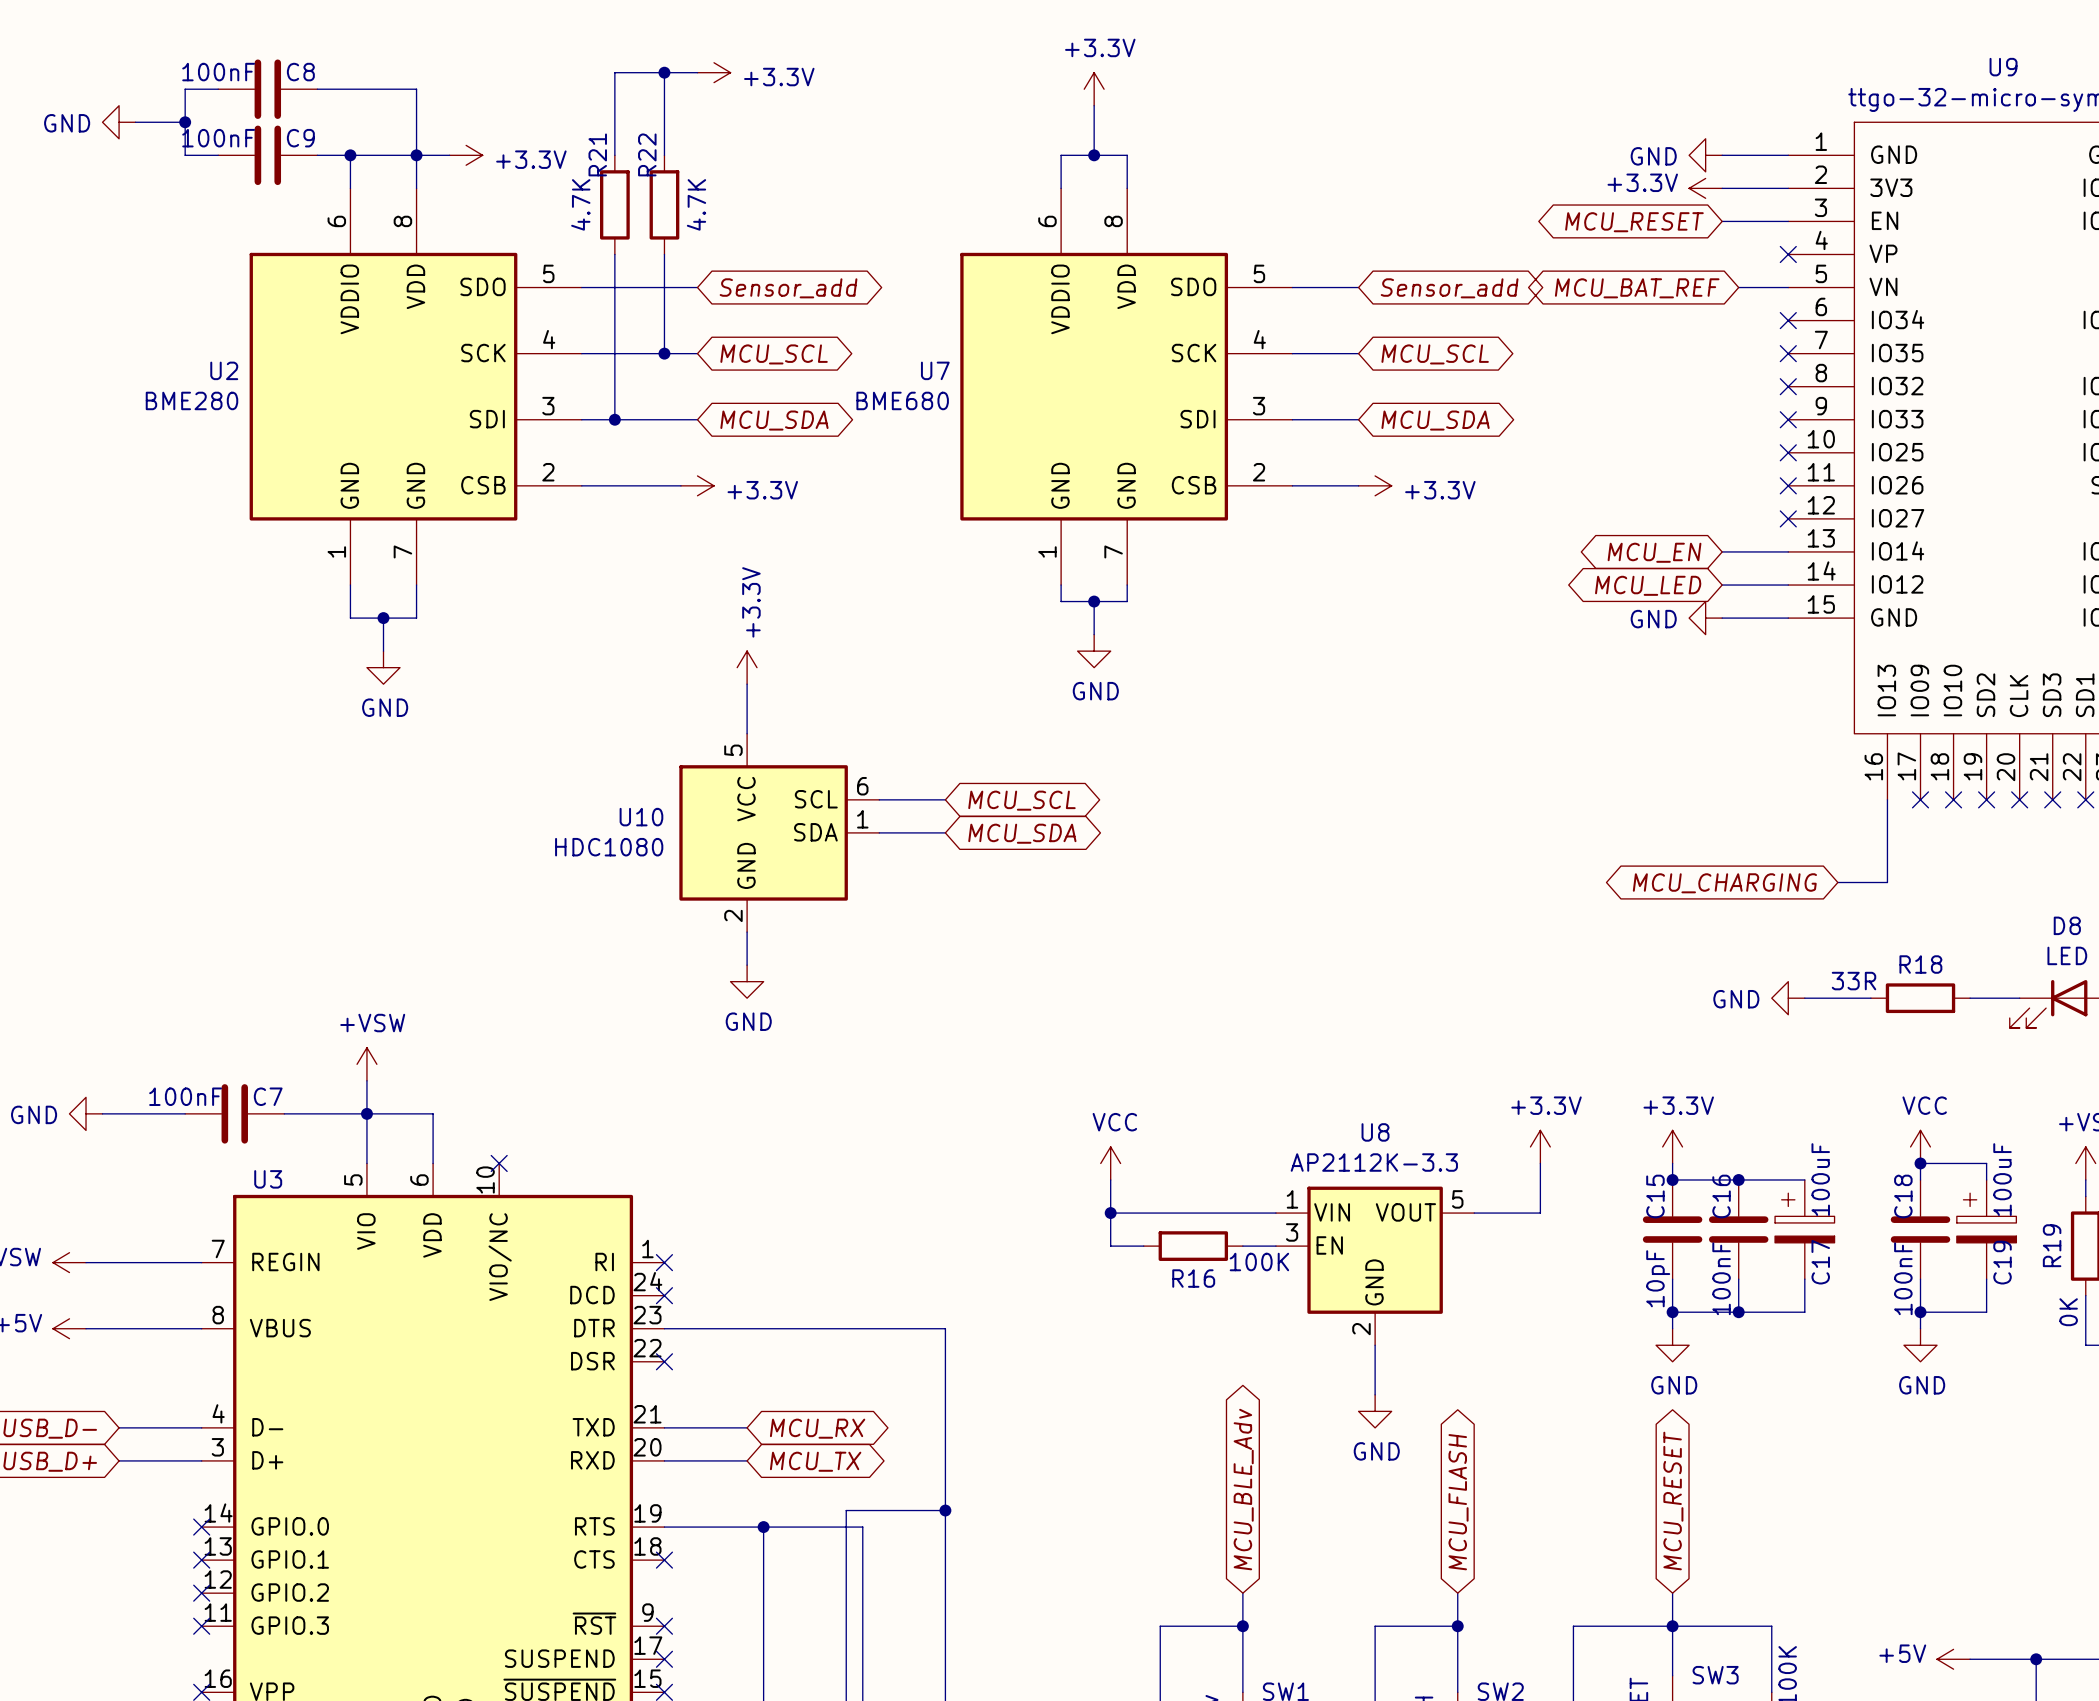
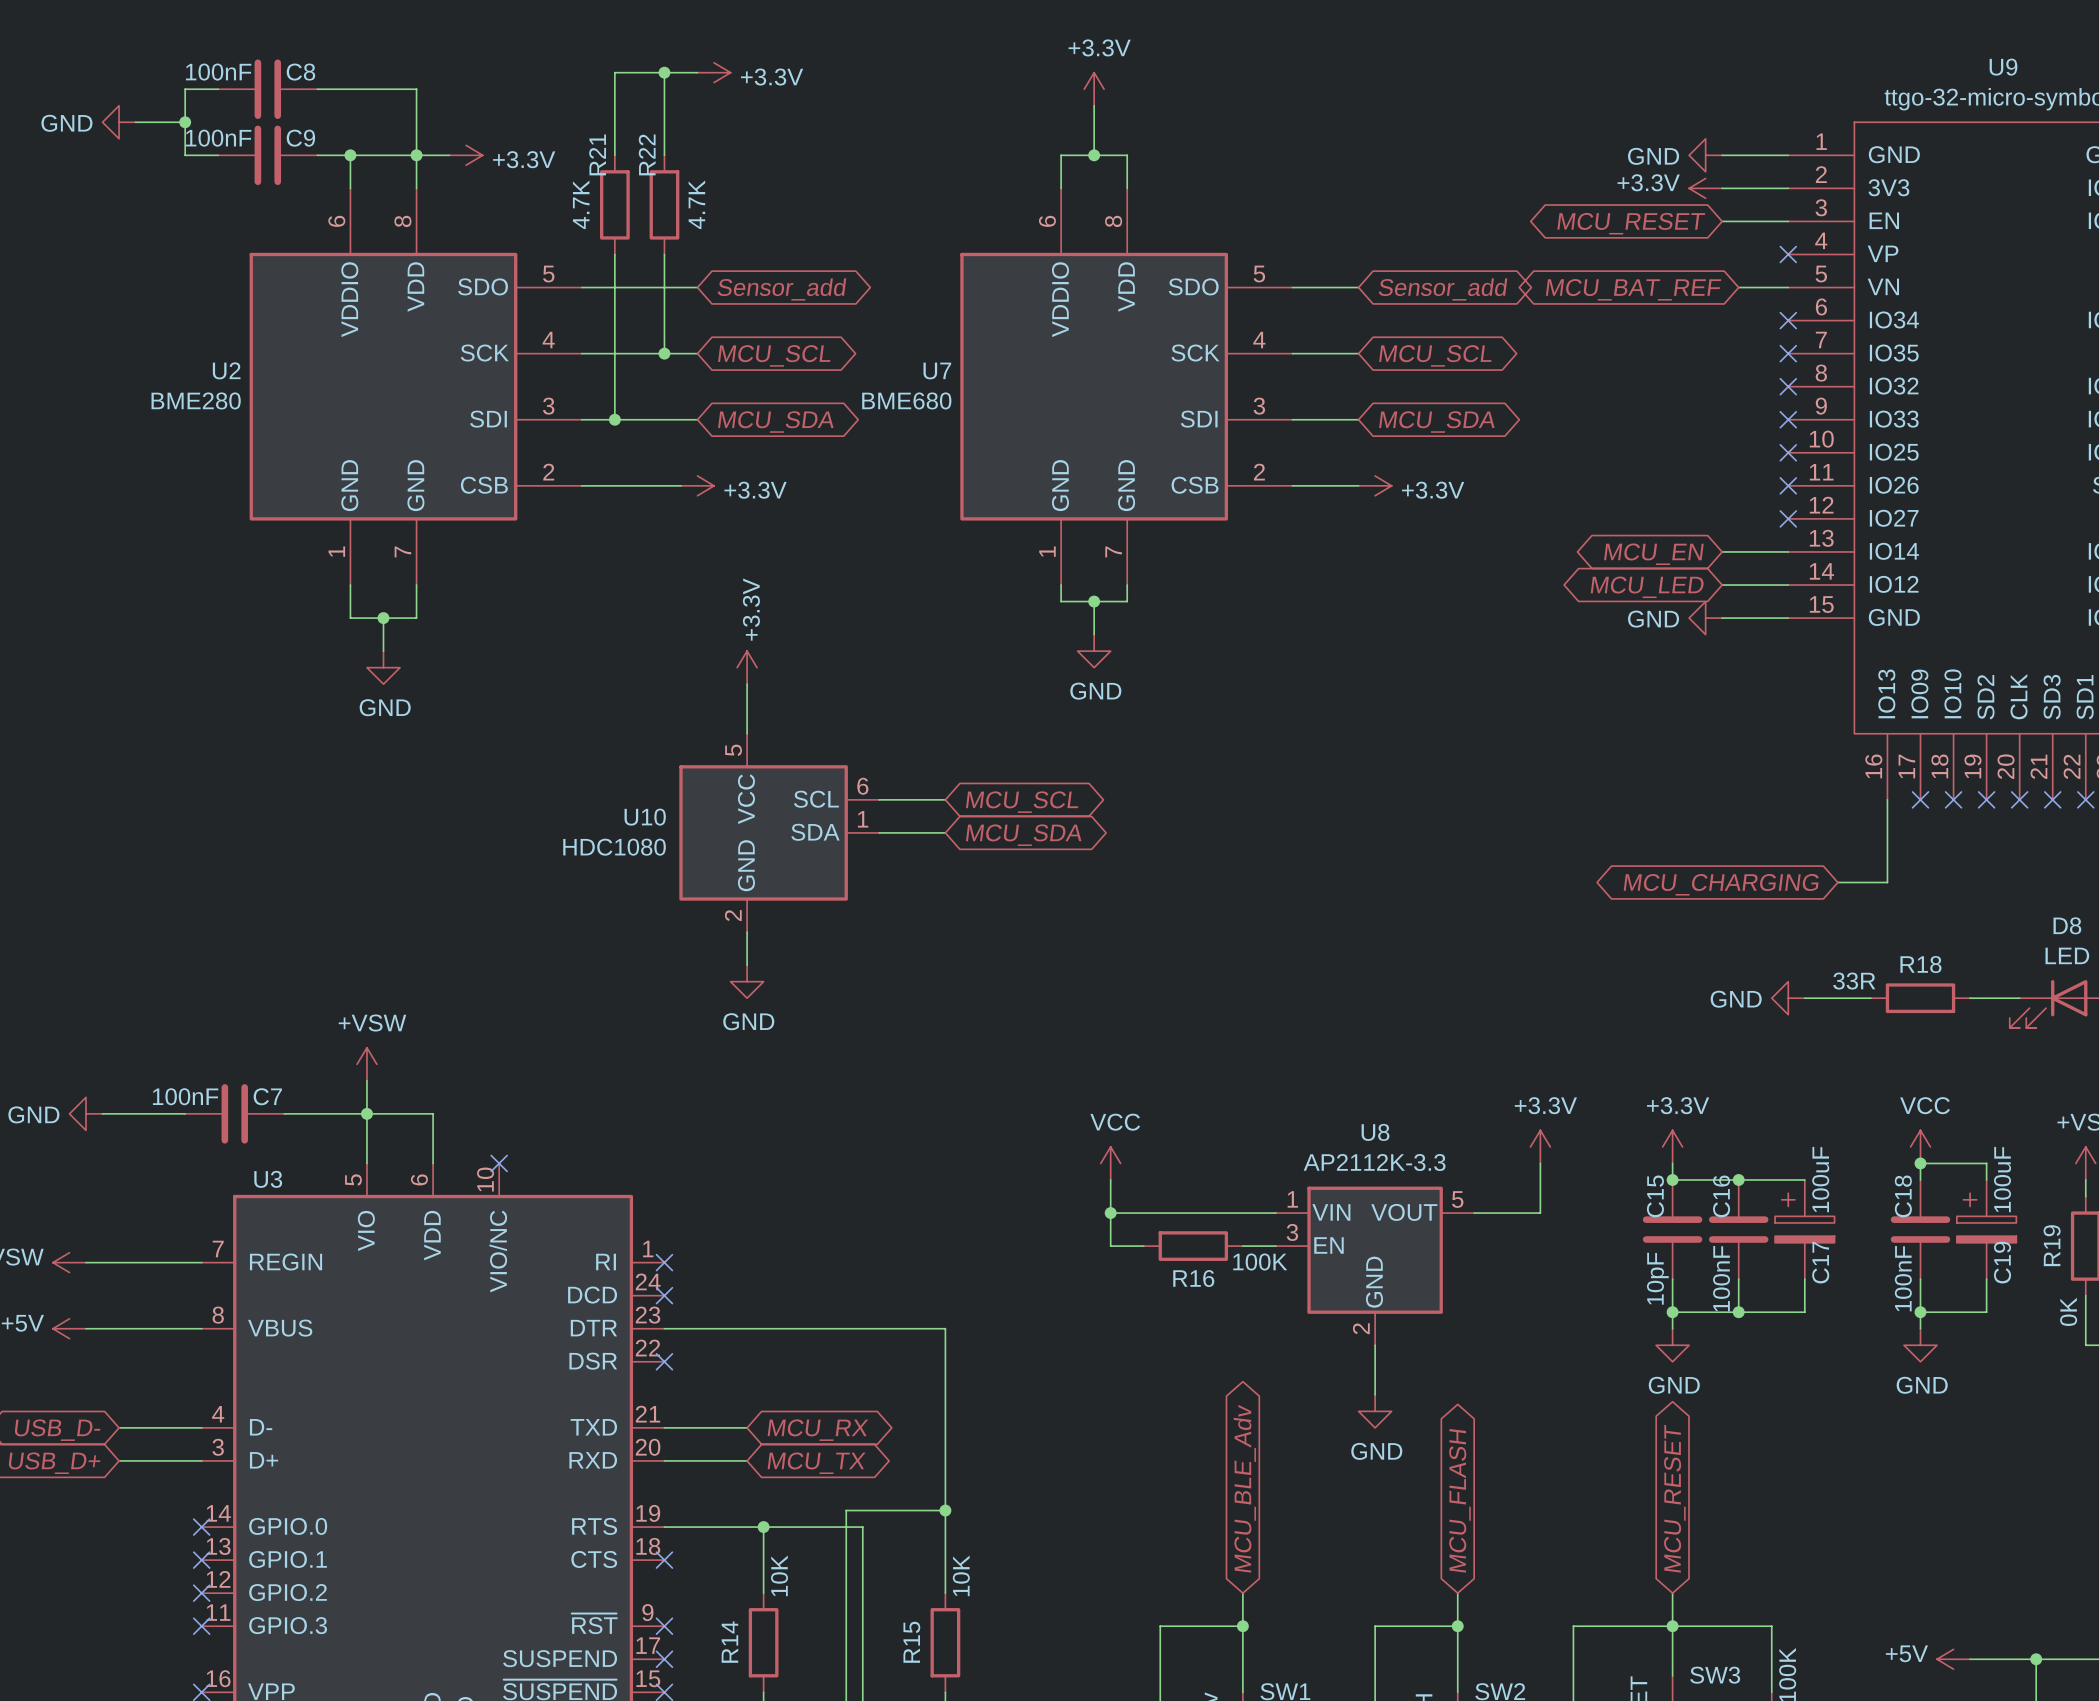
wire: (763, 1593) (763, 1692) -> none
wire: (945, 1593) (945, 1692) -> none
R14: none -> 10K (763, 1642)
R15: none -> 10K (945, 1642)

